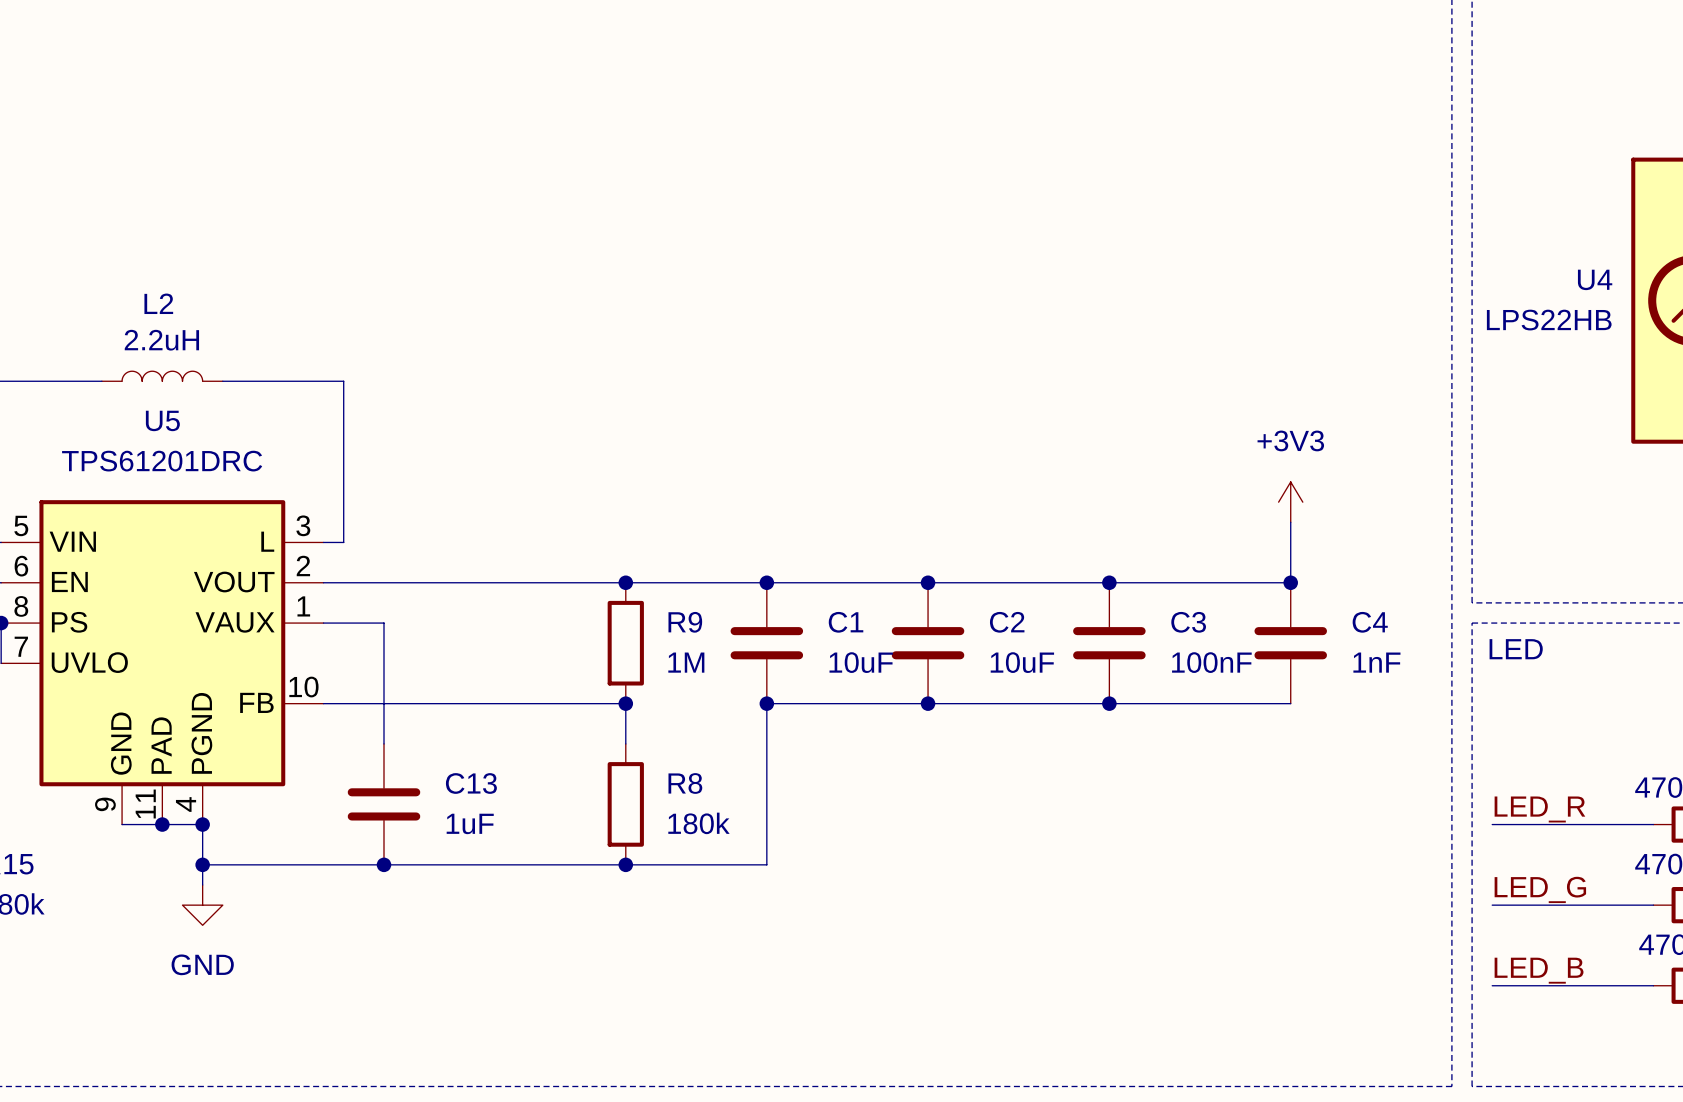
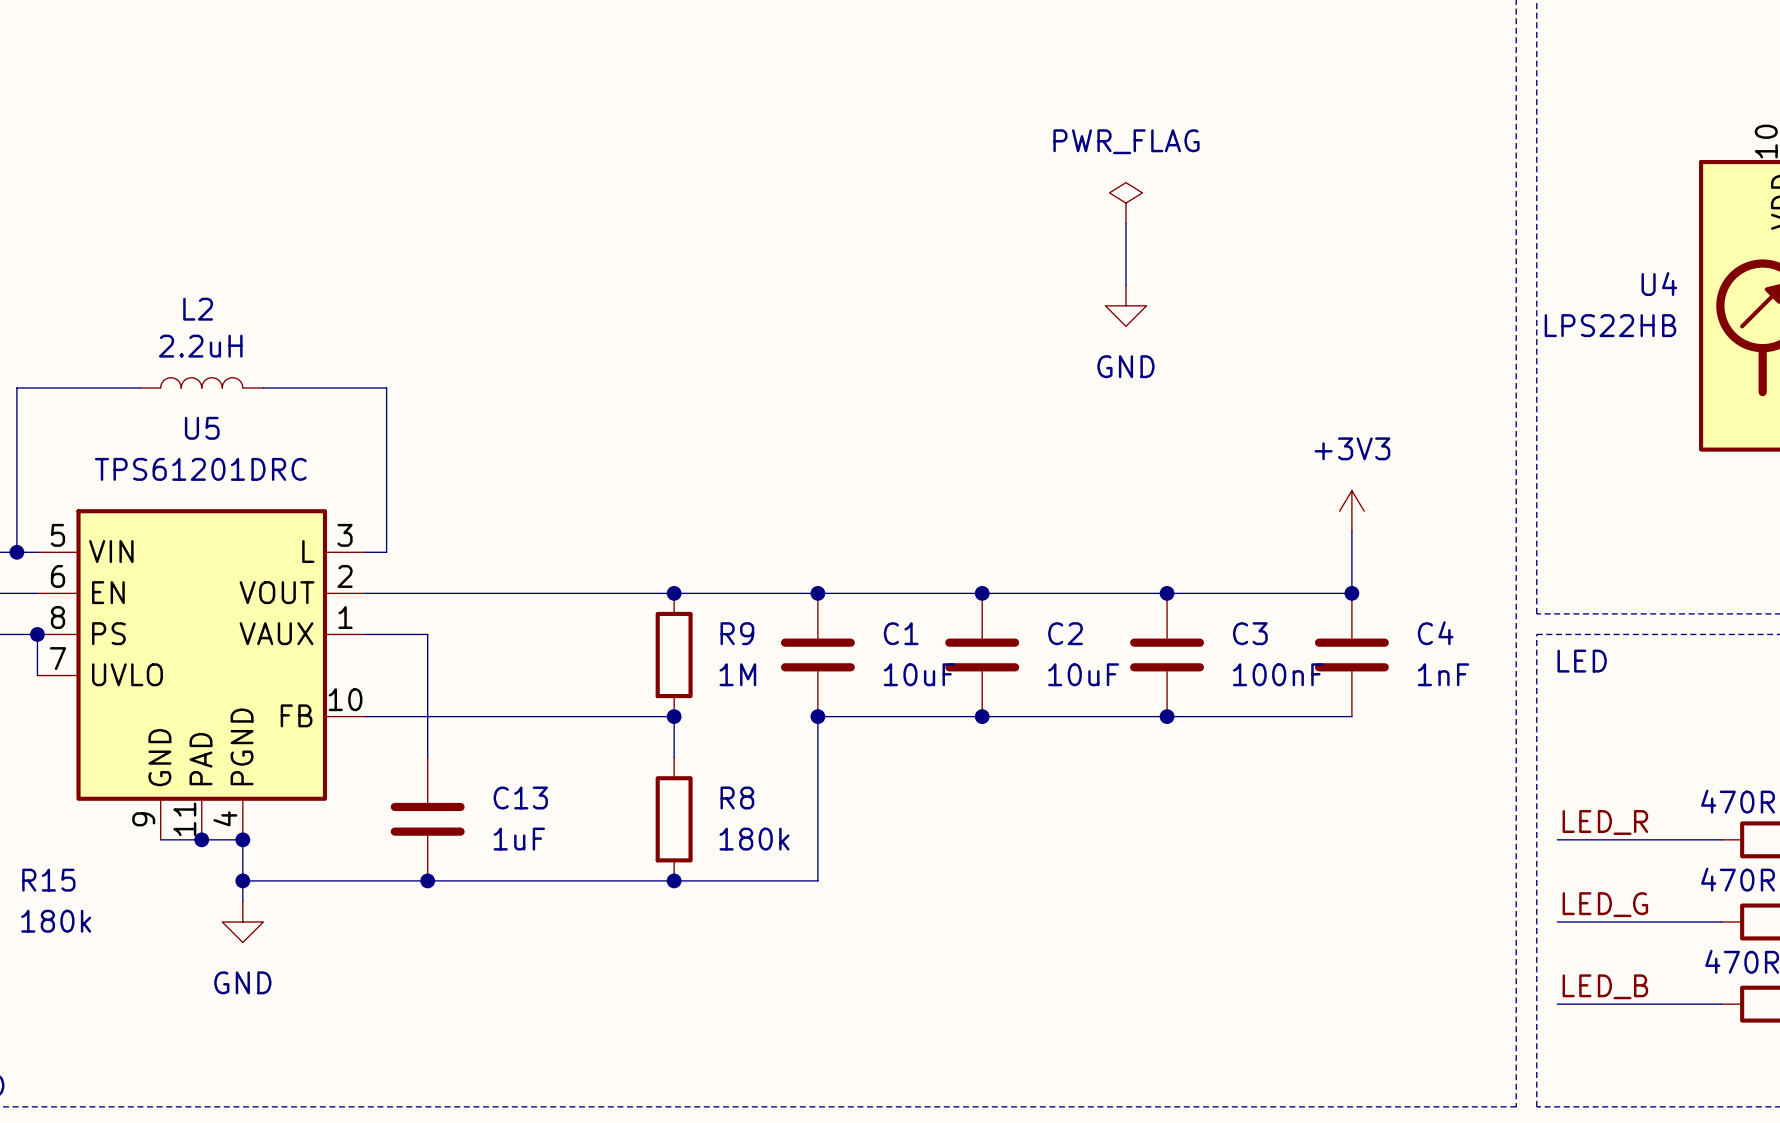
power symbol: none -> PWR_FLAG (1125, 203)
wire: none -> (1125, 223) (1125, 285)
power symbol: none -> GND (1125, 305)

